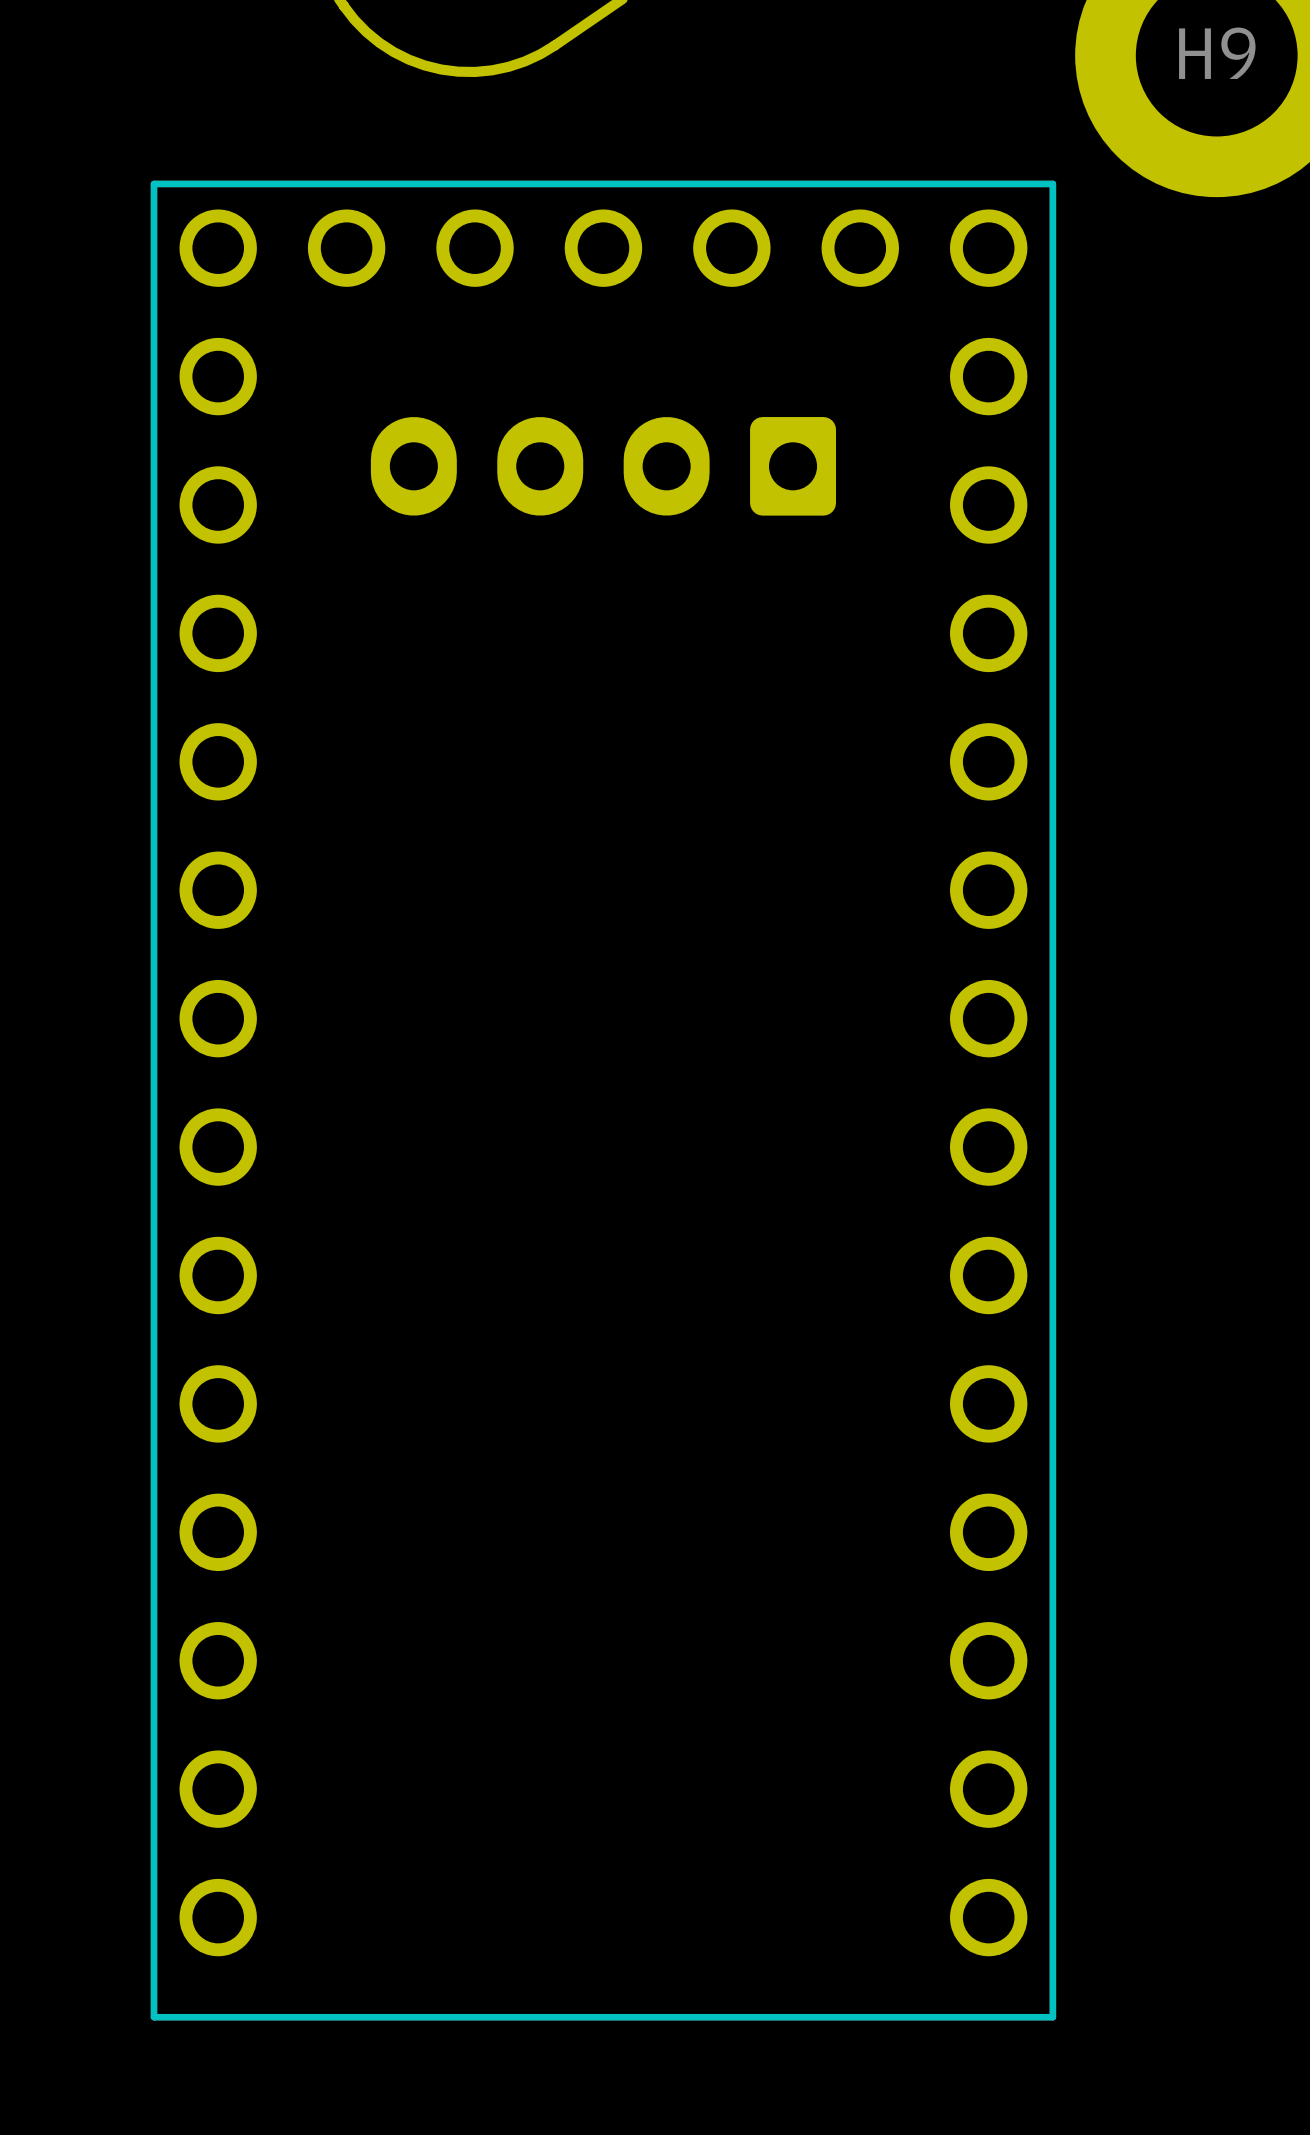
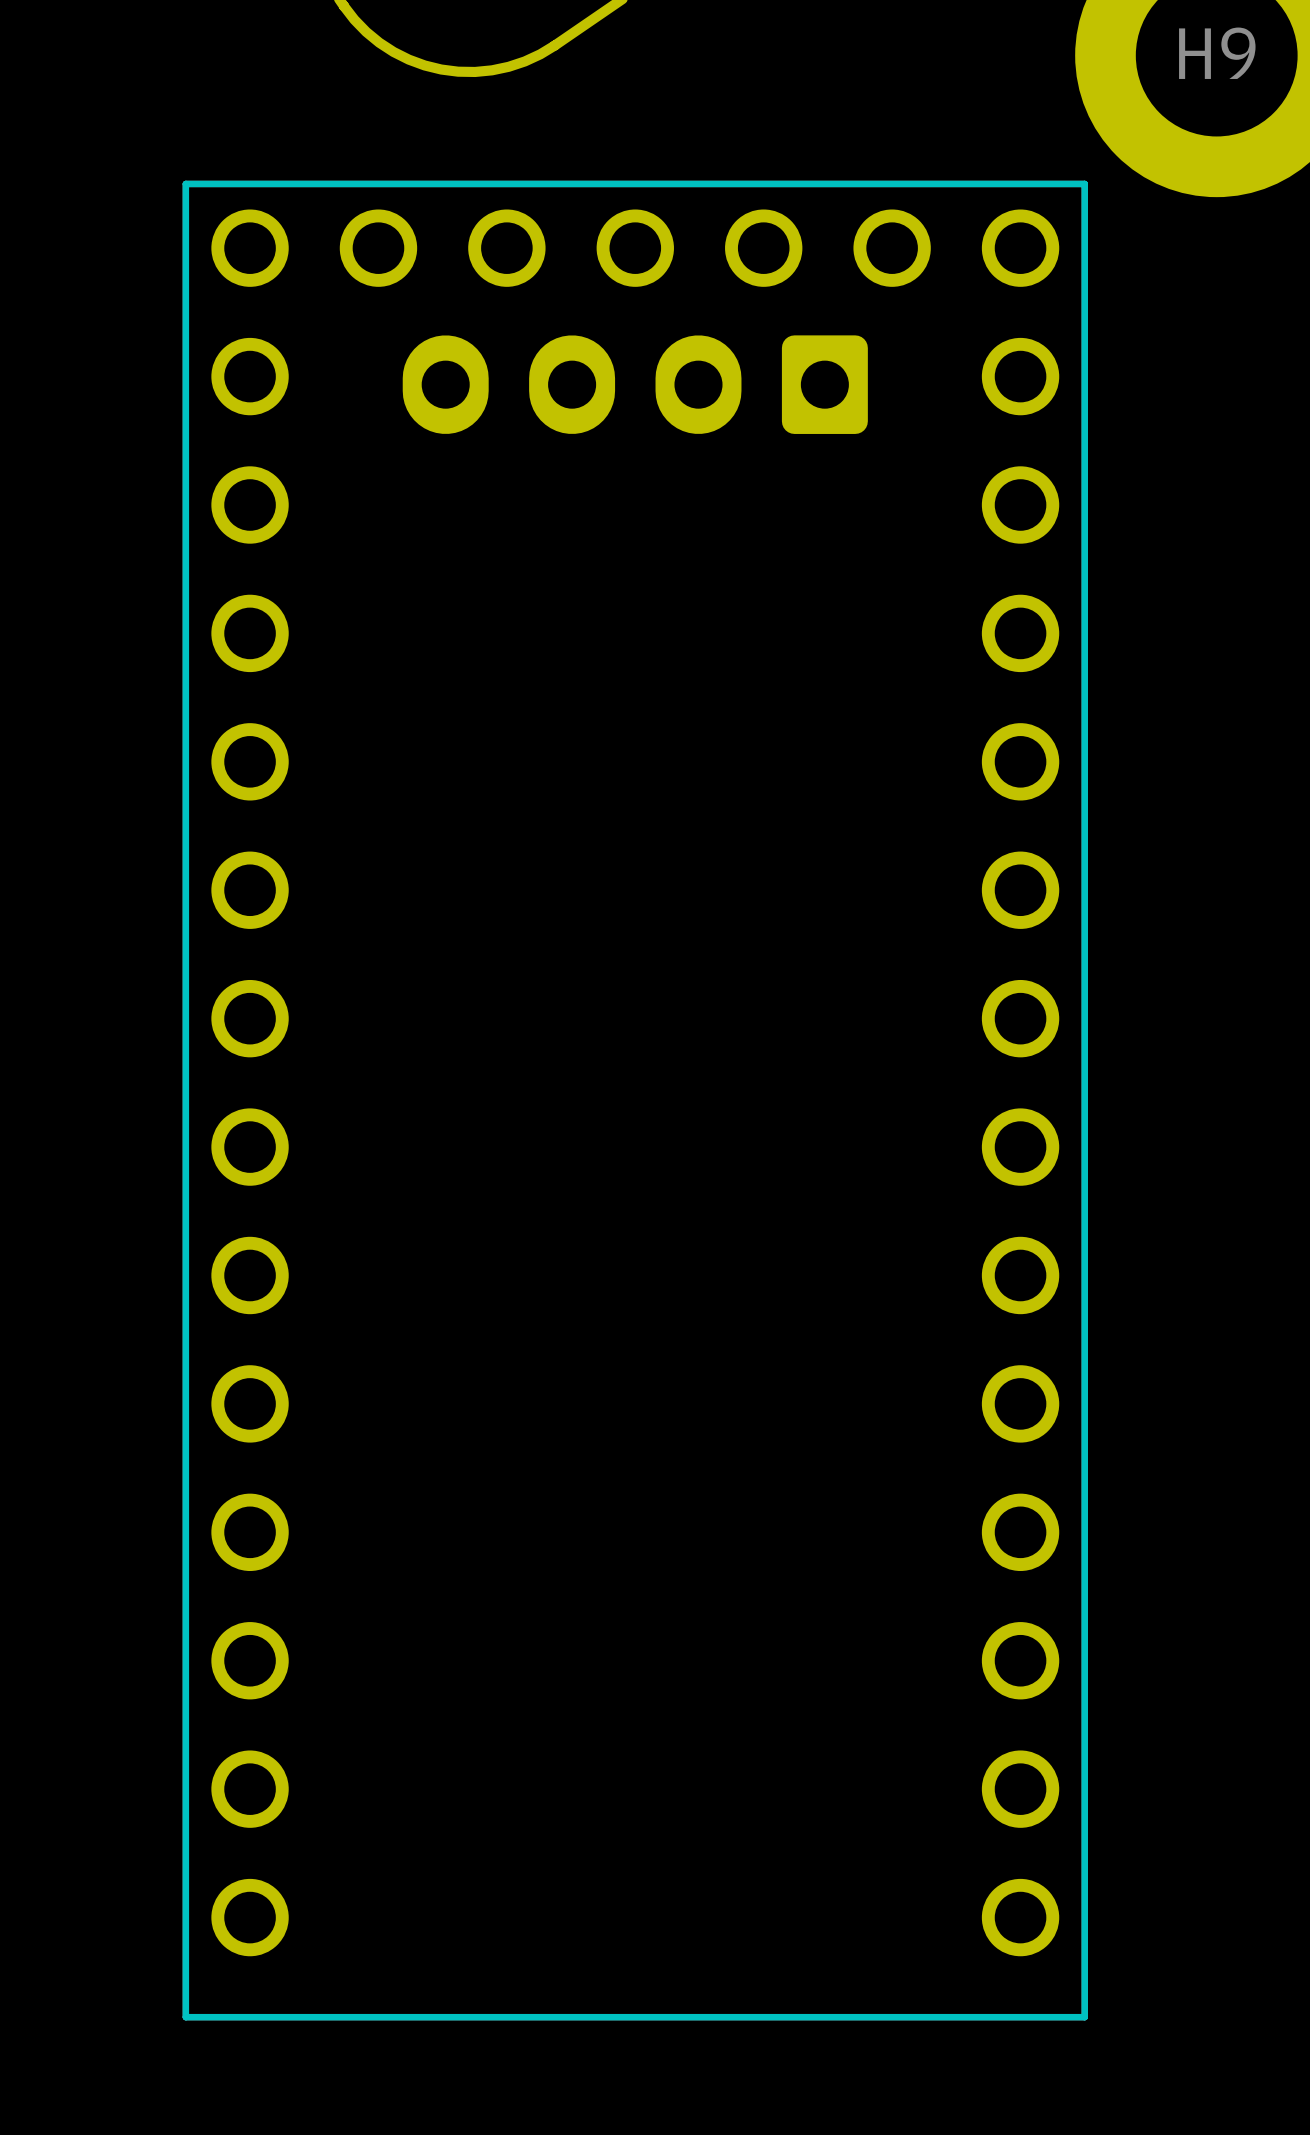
part position: (603, 466) -> (635, 384)
part position: (603, 1100) -> (635, 1100)

